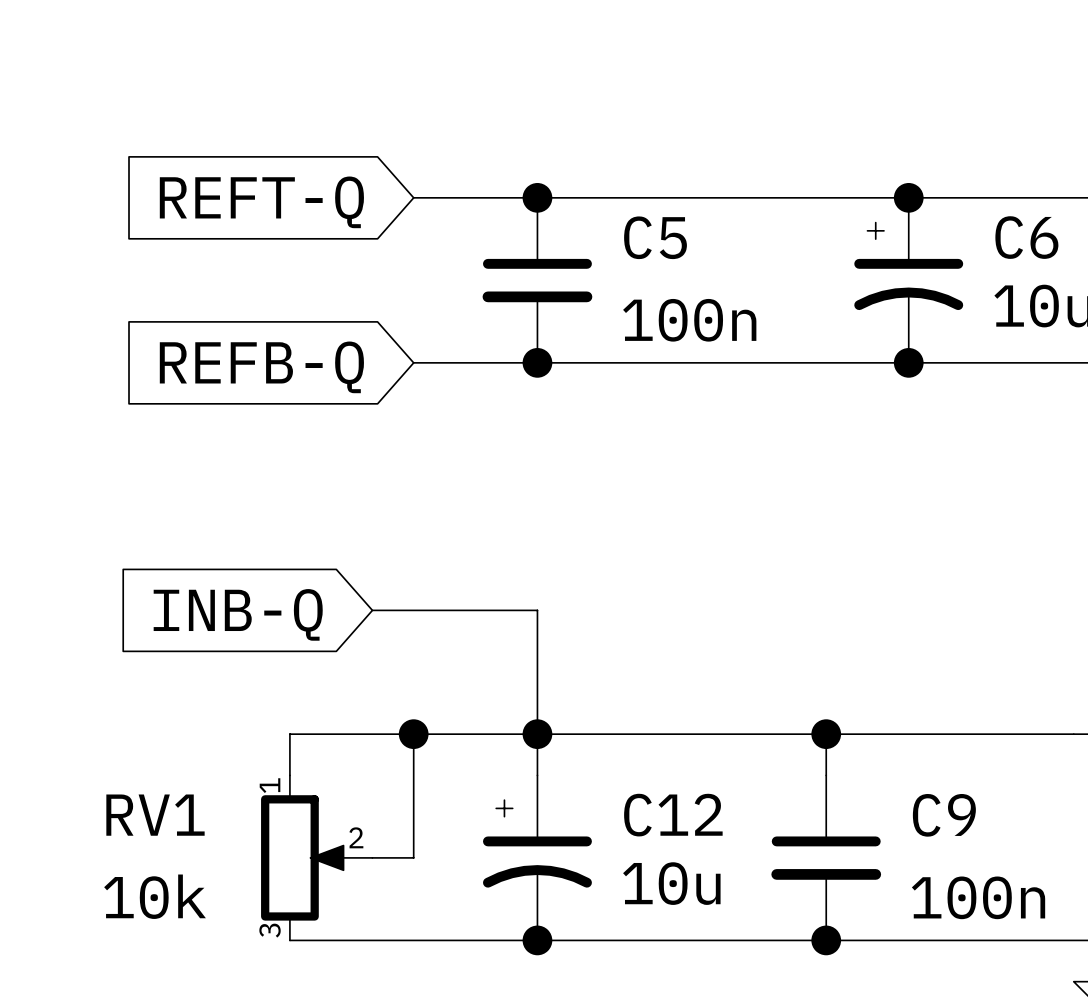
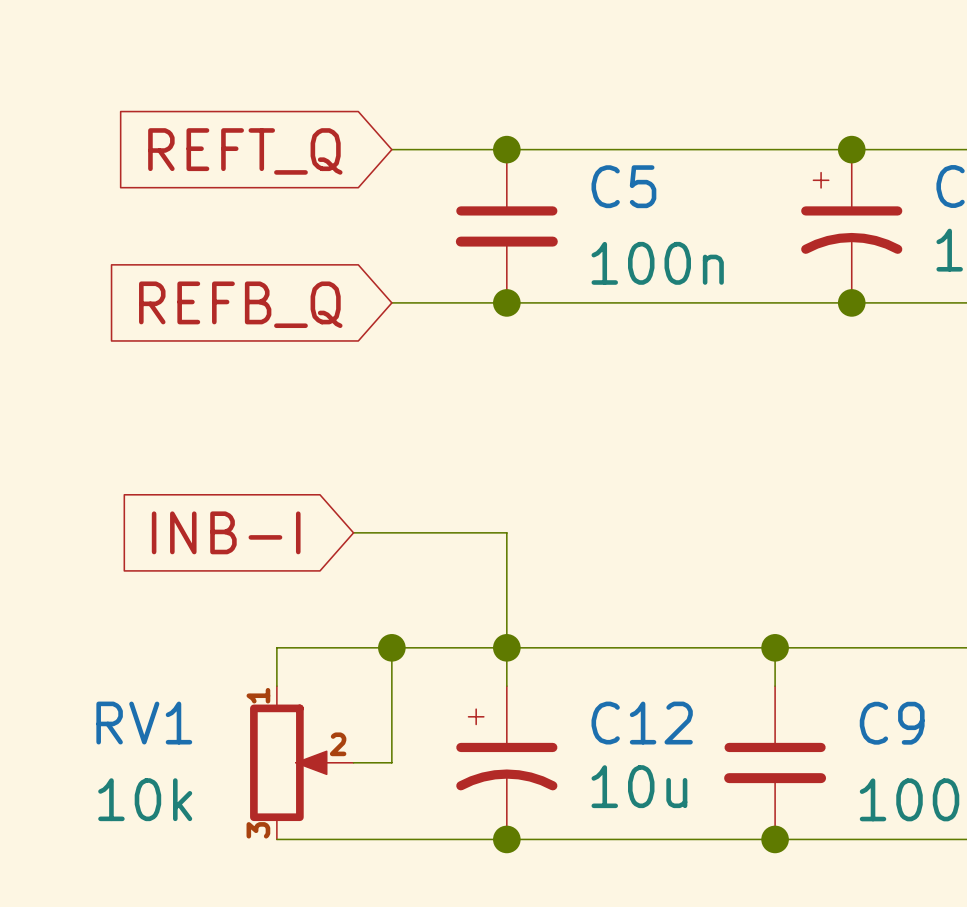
global label: REFT-Q (261, 202) -> REFT_Q (245, 151)
global label: REFB-Q (261, 367) -> REFB_Q (240, 304)
global label: INB-Q (238, 614) -> INB-I (226, 532)

